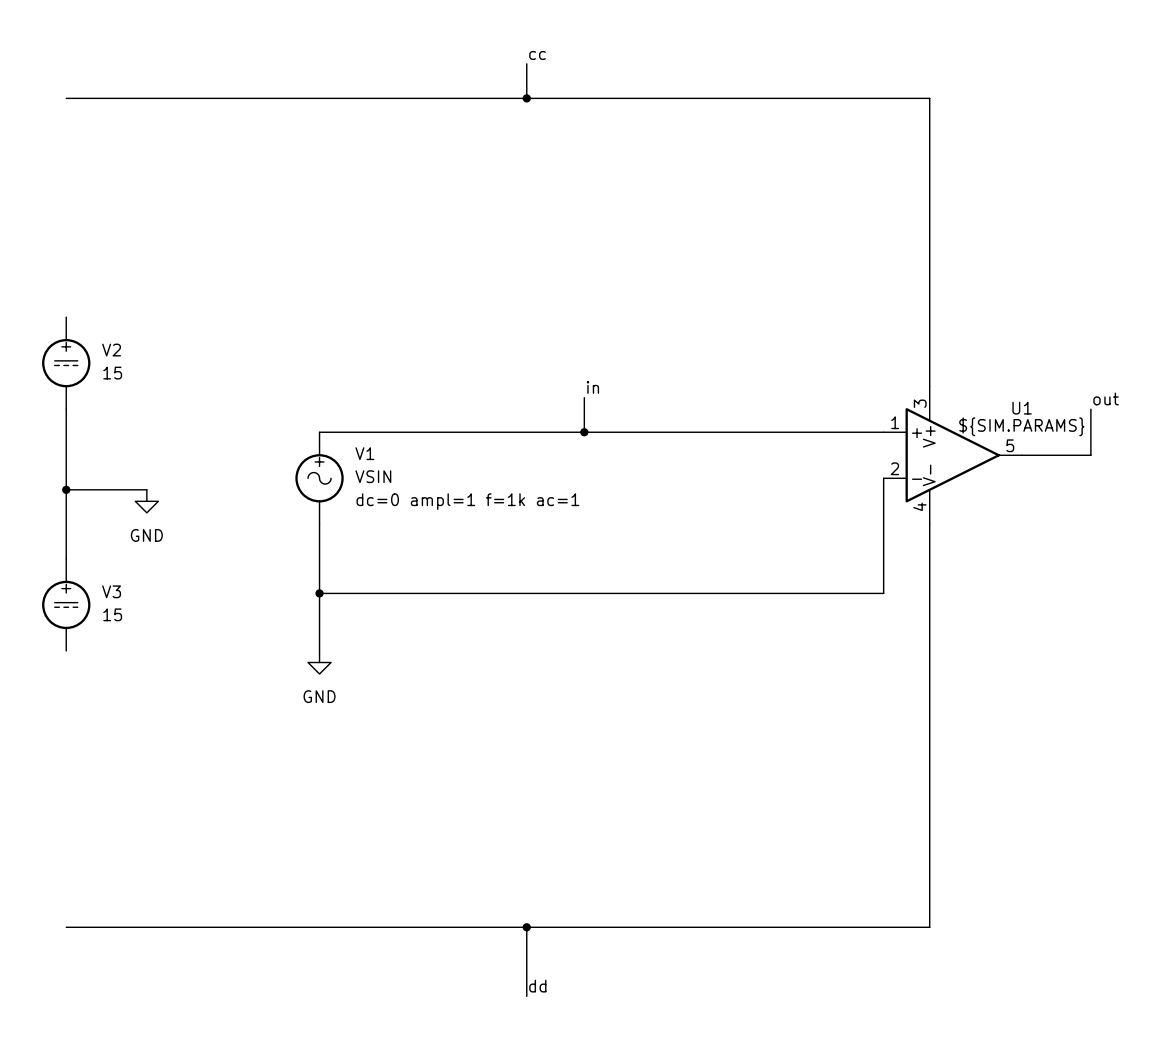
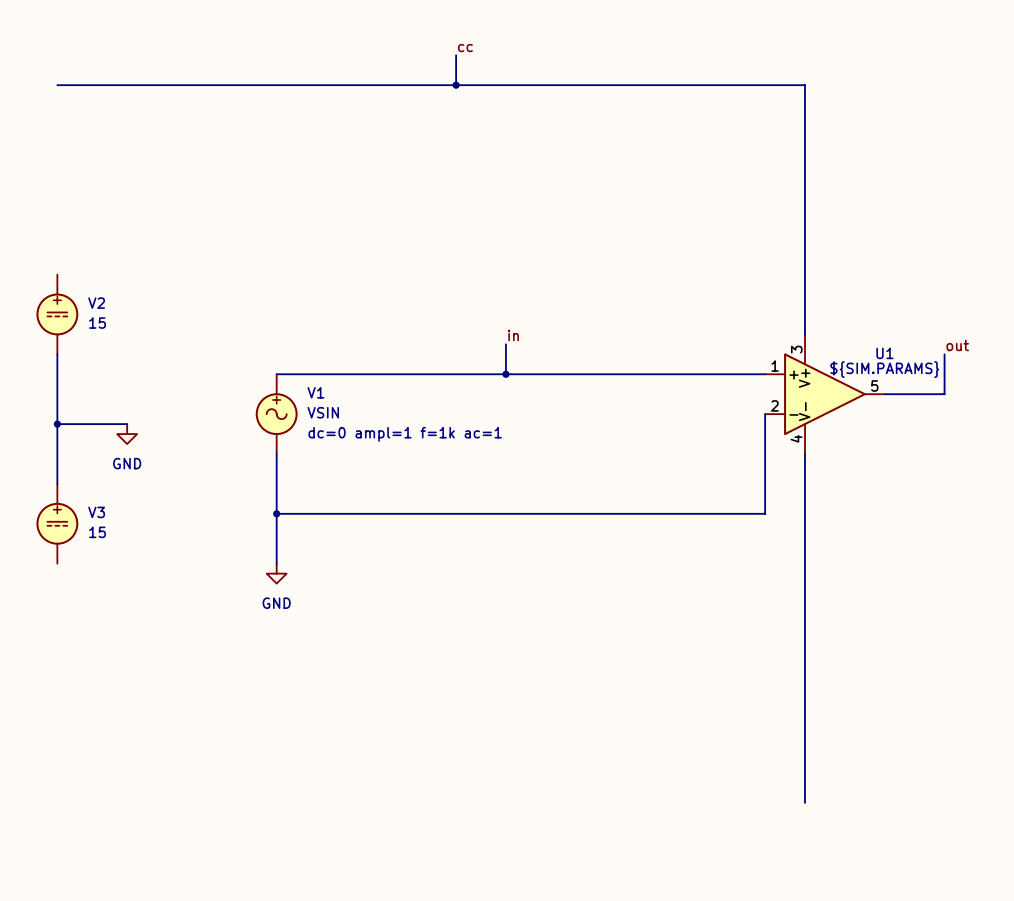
wire: (66, 927) (929, 927) -> none
wire: (526, 927) (526, 996) -> none
junction: (526, 927) -> none
label: dd (537, 986) -> none

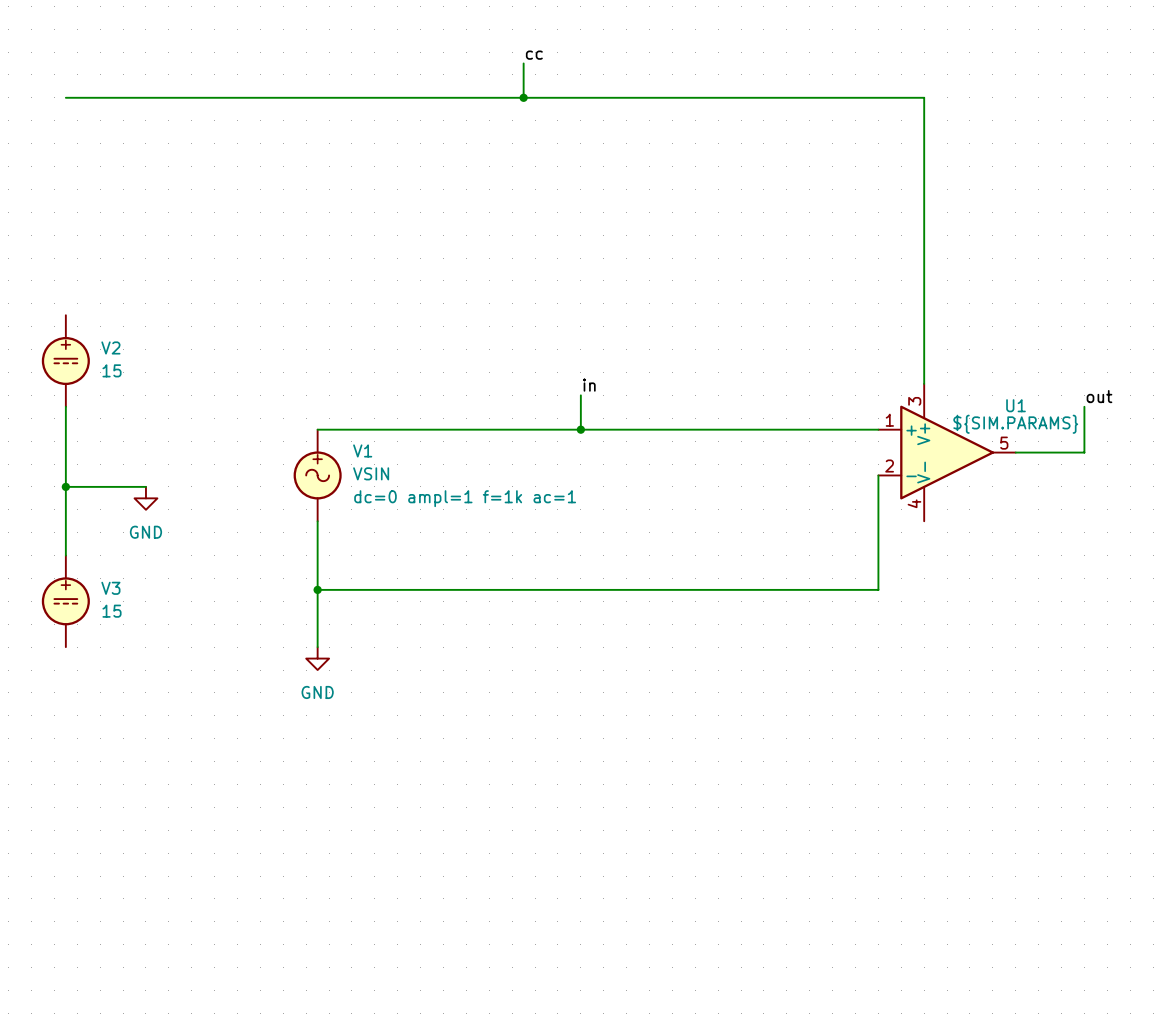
wire: (805, 454) (805, 802) -> none

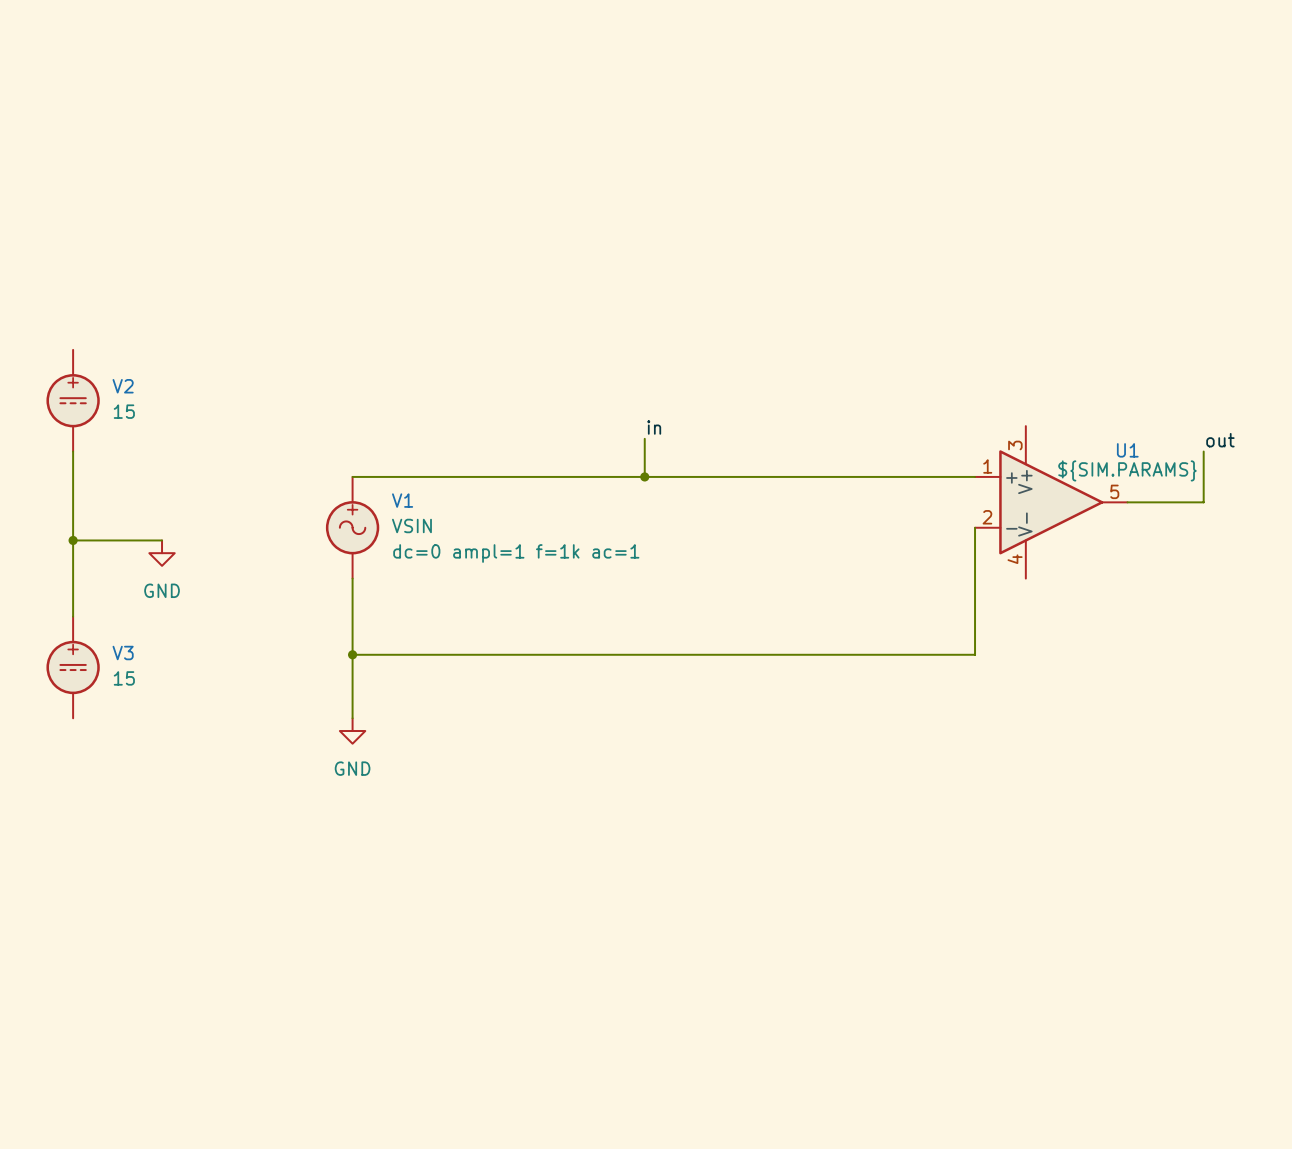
label: cc (534, 55) -> none
wire: (523, 63) (523, 97) -> none
wire: (65, 97) (924, 97) (924, 383) -> none
junction: (523, 97) -> none

